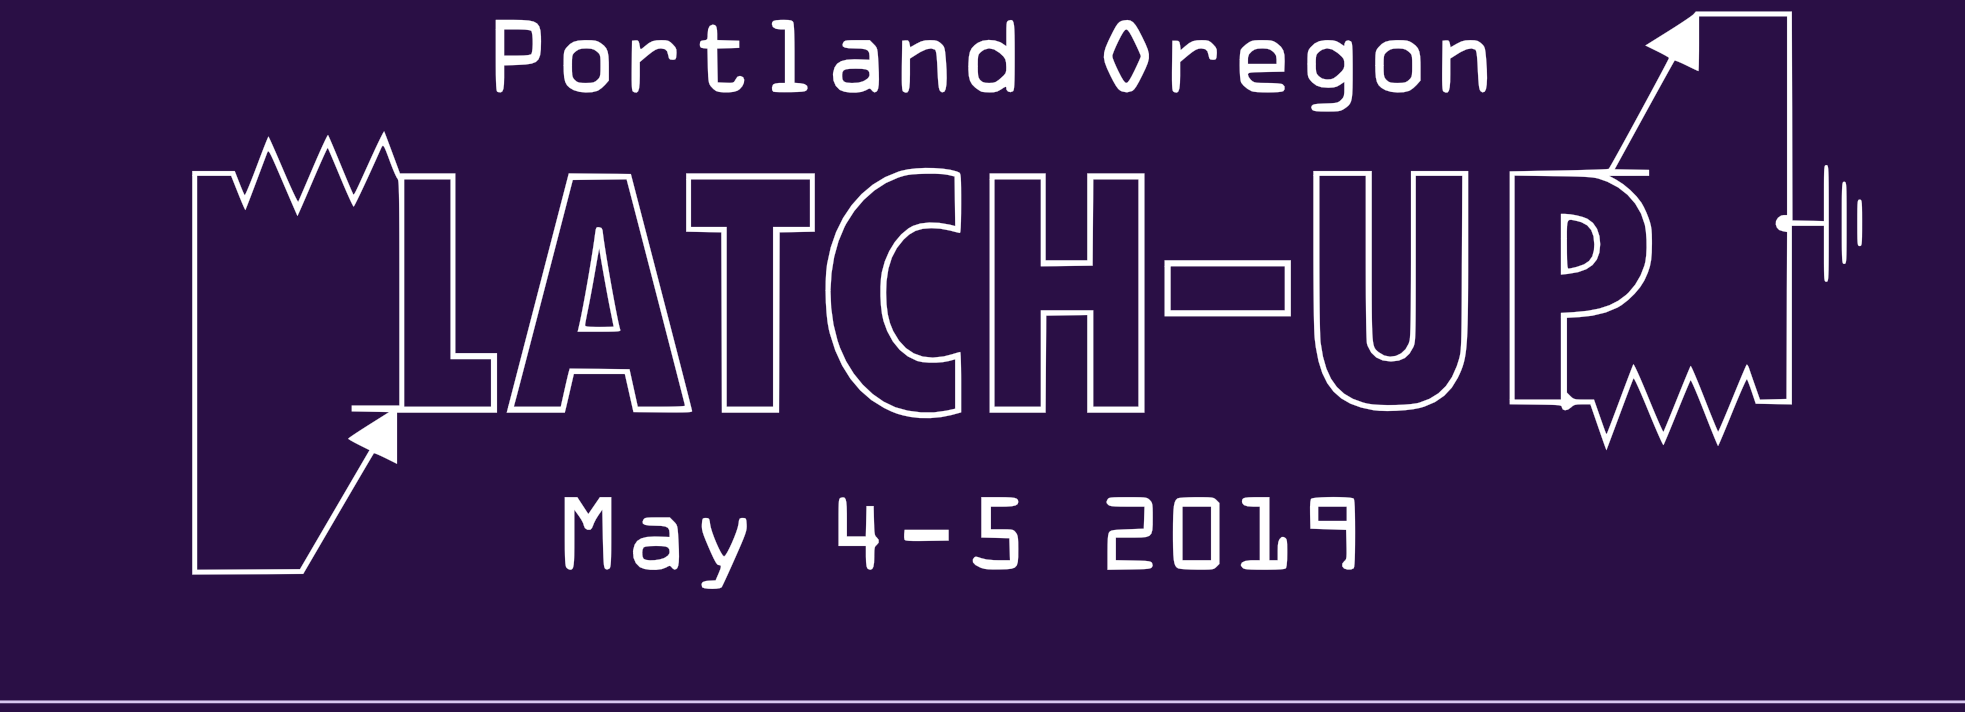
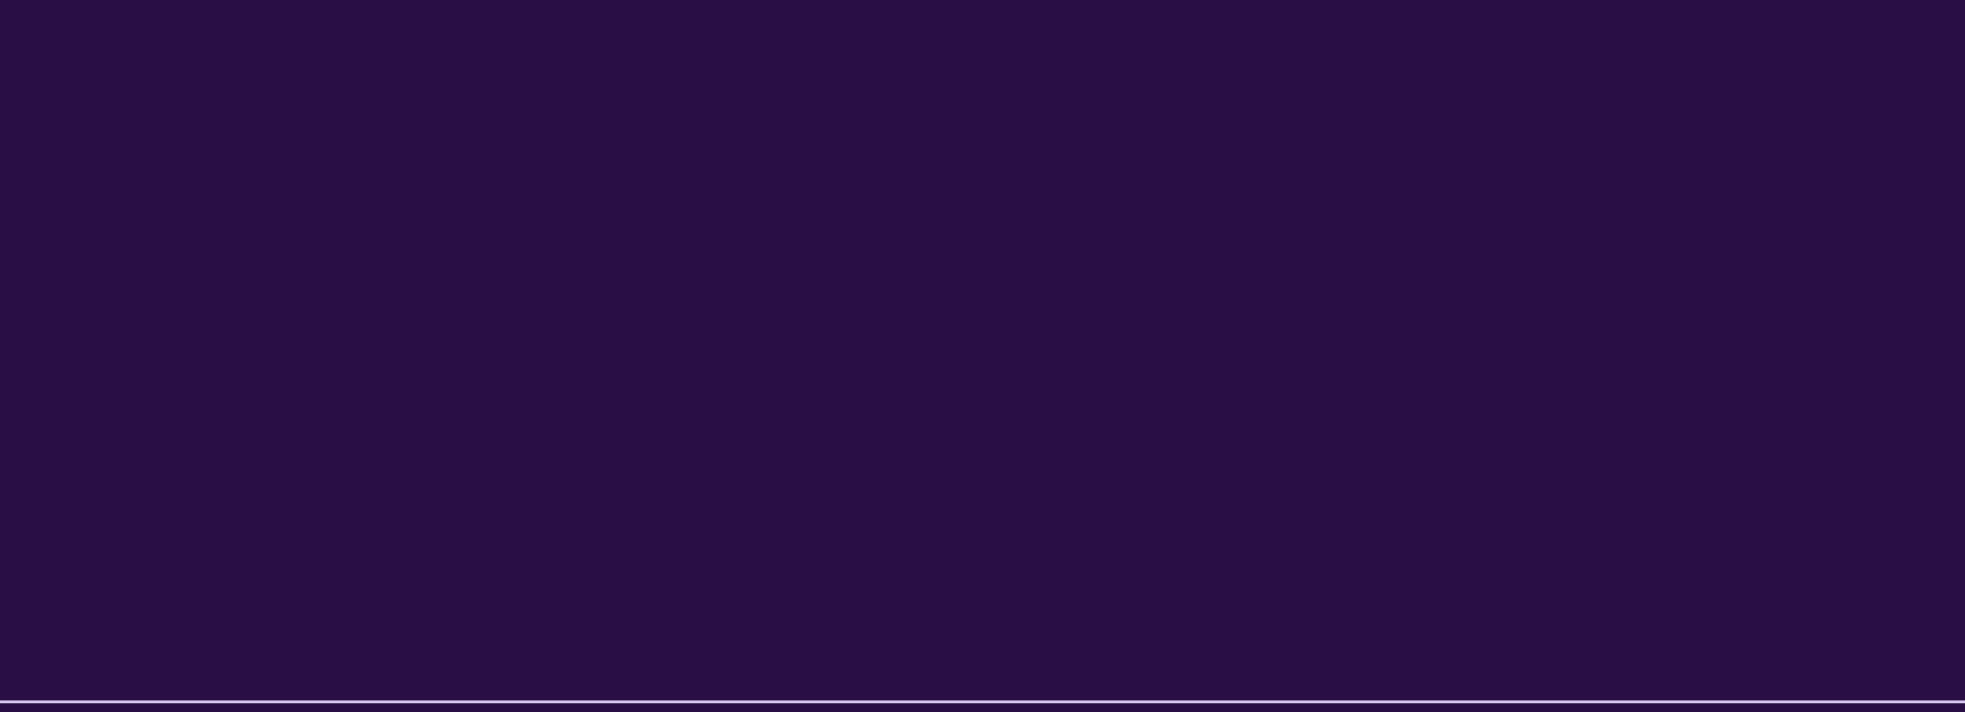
drawing: [192, 11, 1863, 589] -> none

